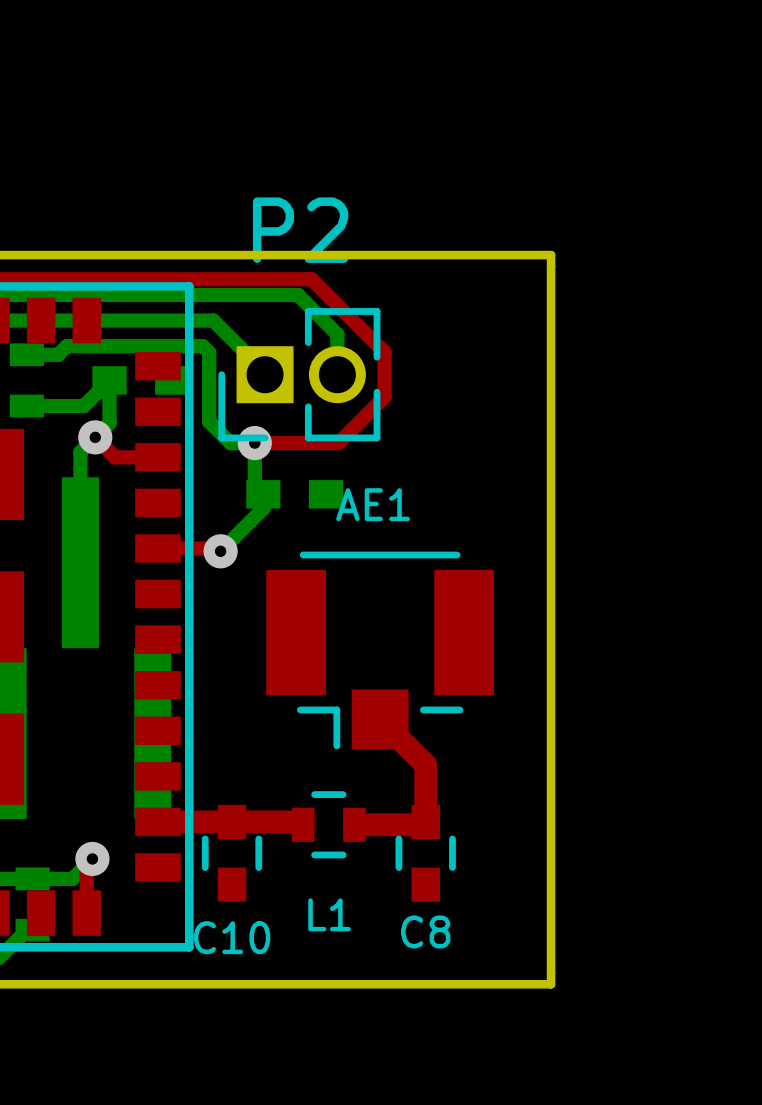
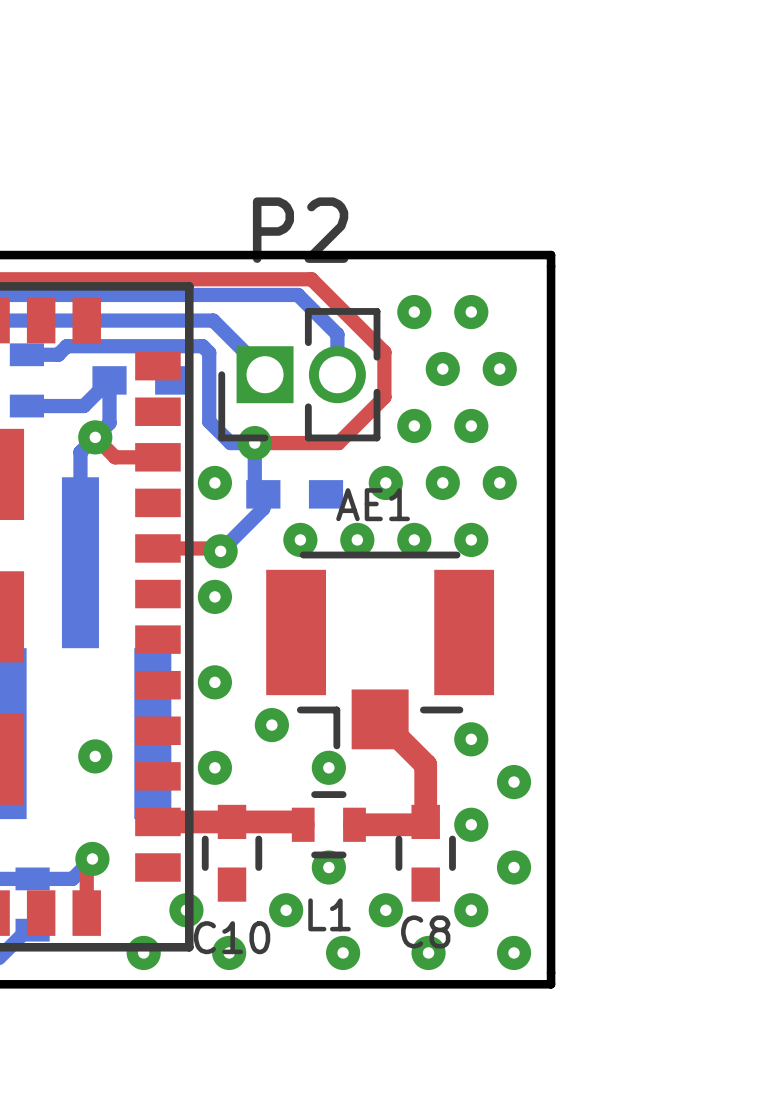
part: none -> (414, 312)
part: none -> (471, 312)
part: none -> (442, 369)
part: none -> (499, 369)
part: none -> (414, 425)
part: none -> (471, 425)
part: none -> (214, 482)
part: none -> (385, 482)
part: none -> (442, 482)
part: none -> (499, 482)
part: none -> (300, 539)
part: none -> (357, 539)
part: none -> (414, 539)
part: none -> (471, 539)
part: none -> (214, 596)
part: none -> (214, 682)
part: none -> (271, 725)
part: none -> (471, 739)
part: none -> (95, 756)
part: none -> (214, 767)
part: none -> (328, 767)
part: none -> (514, 782)
part: none -> (471, 824)
part: none -> (328, 867)
part: none -> (514, 867)
part: none -> (186, 910)
part: none -> (286, 910)
part: none -> (385, 910)
part: none -> (471, 910)
part: none -> (143, 952)
part: none -> (229, 952)
part: none -> (343, 952)
part: none -> (428, 952)
part: none -> (514, 952)

